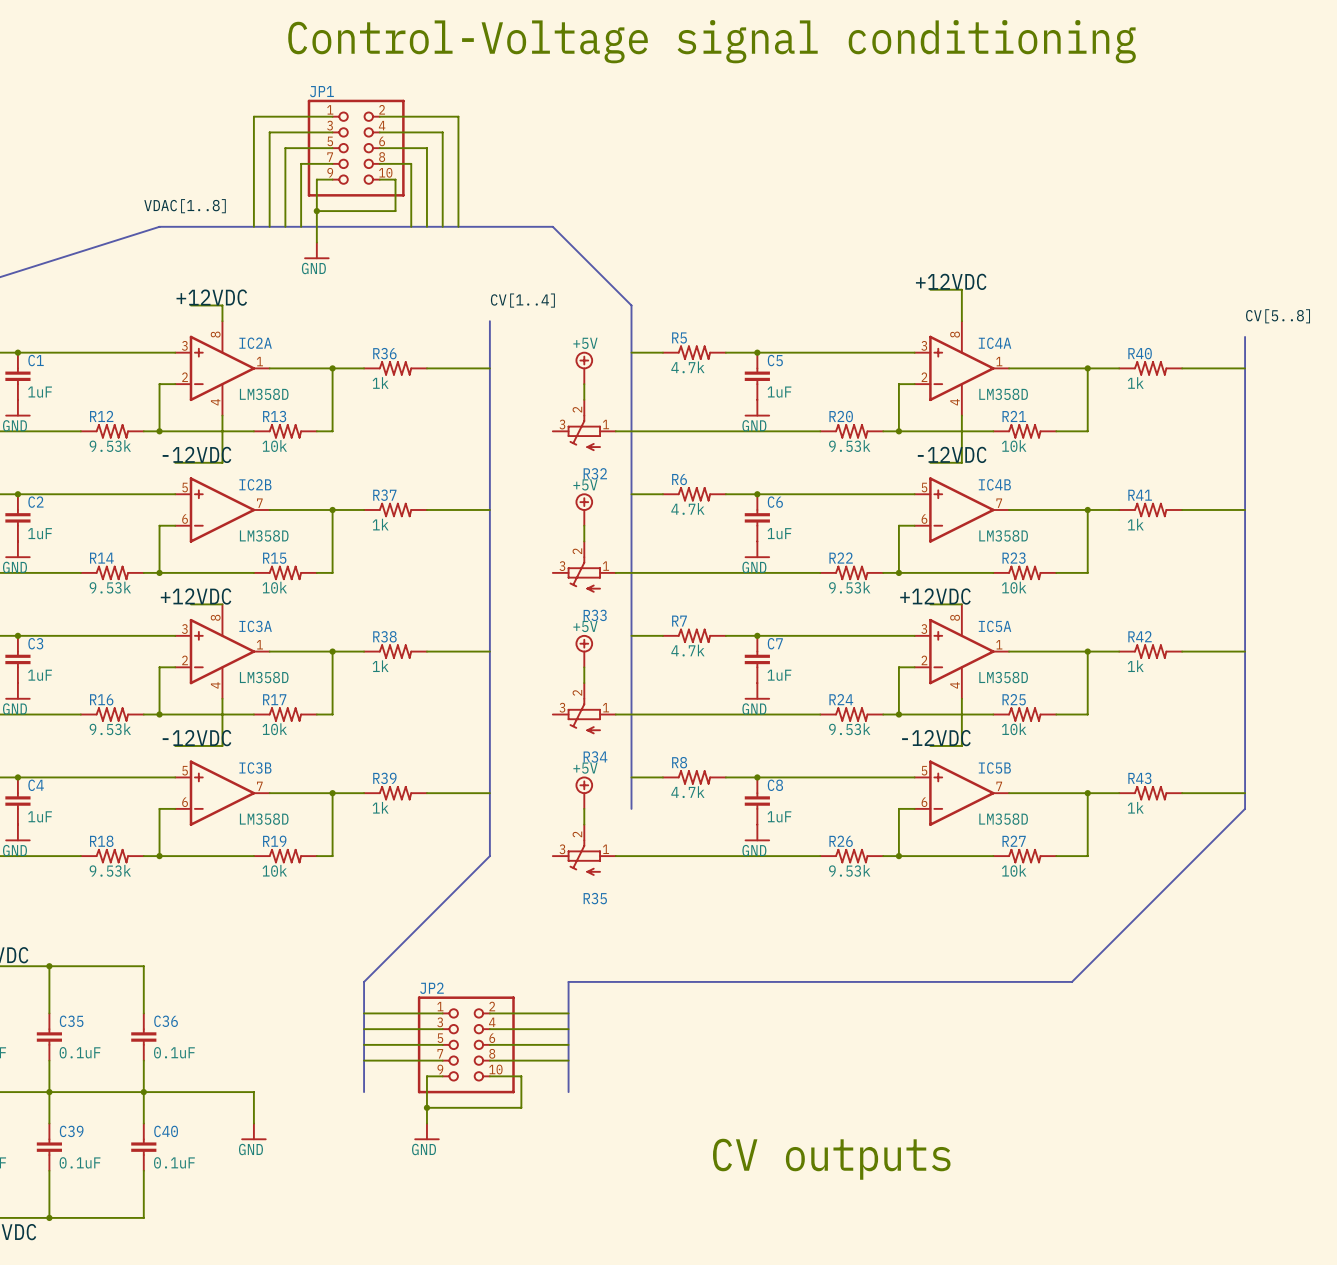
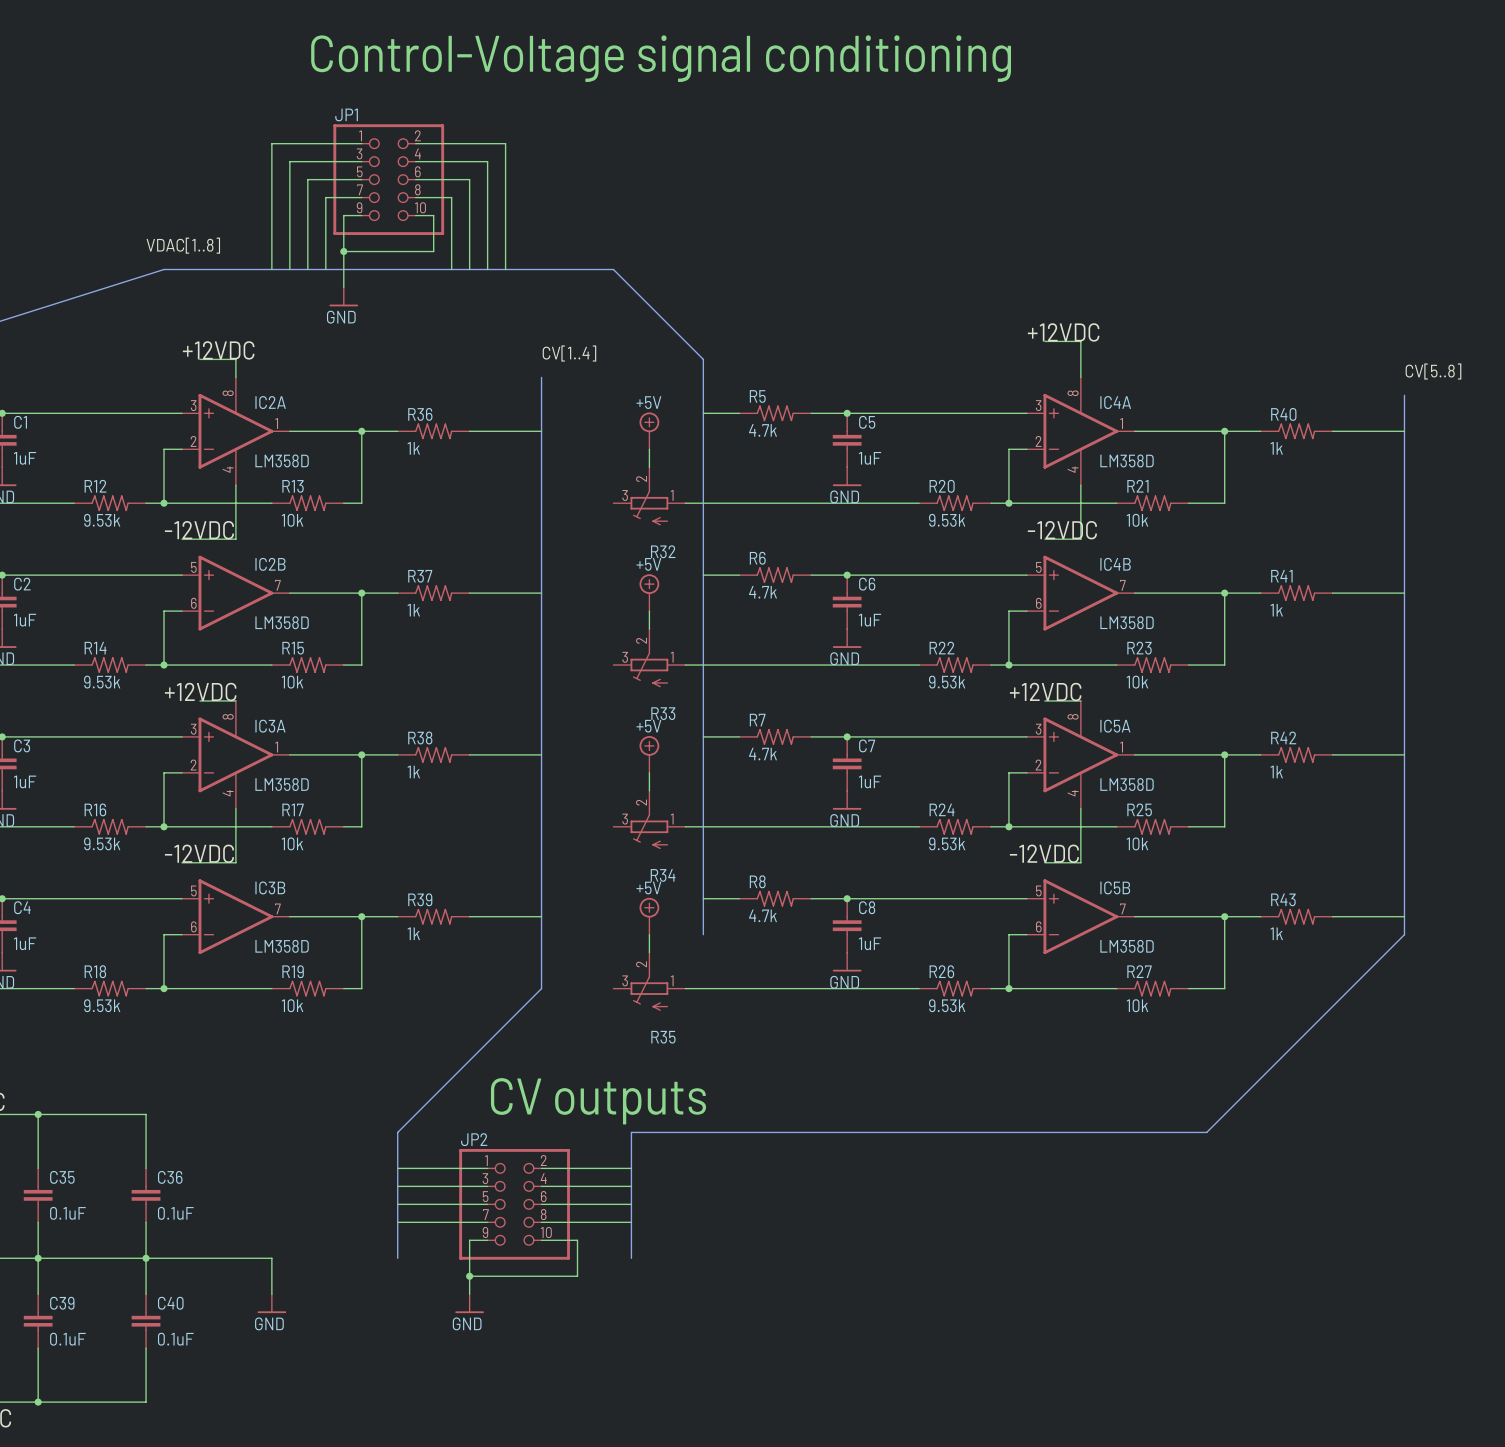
text: none -> CV outputs (598, 1101)
text: CV outputs (831, 1159) -> none

